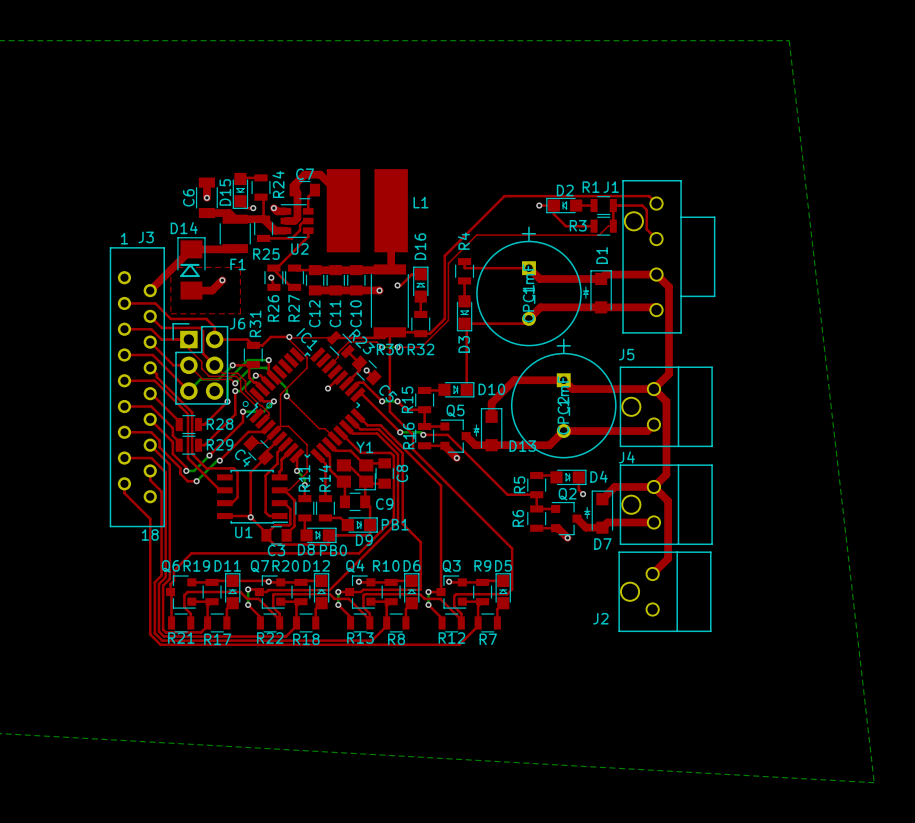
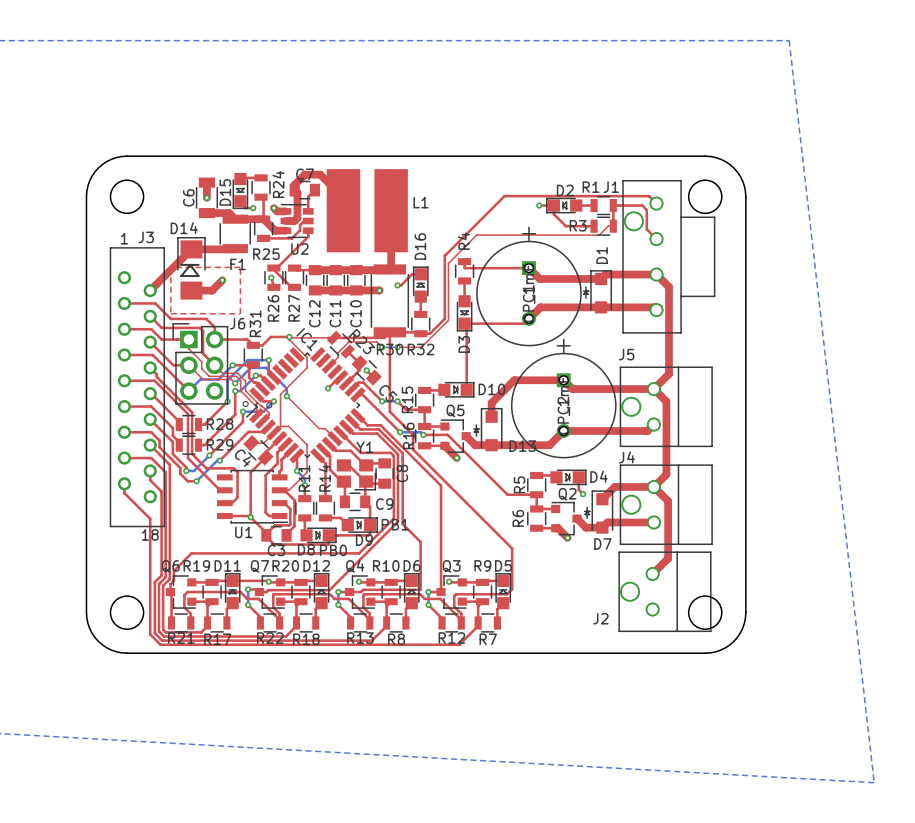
board edge: none -> (127, 156) (705, 156) (720, 159) (729, 164) (740, 176) (745, 196) (745, 612) (742, 628) (737, 637) (720, 650) (705, 653) (127, 653) (111, 650) (102, 644) (91, 632) (86, 612) (86, 196) (89, 181) (98, 168) (111, 159) (127, 156)
round board edge: none -> [109, 179, 145, 214]
round board edge: none -> [688, 179, 723, 214]
round board edge: none -> [109, 595, 145, 630]
round board edge: none -> [688, 595, 723, 630]

